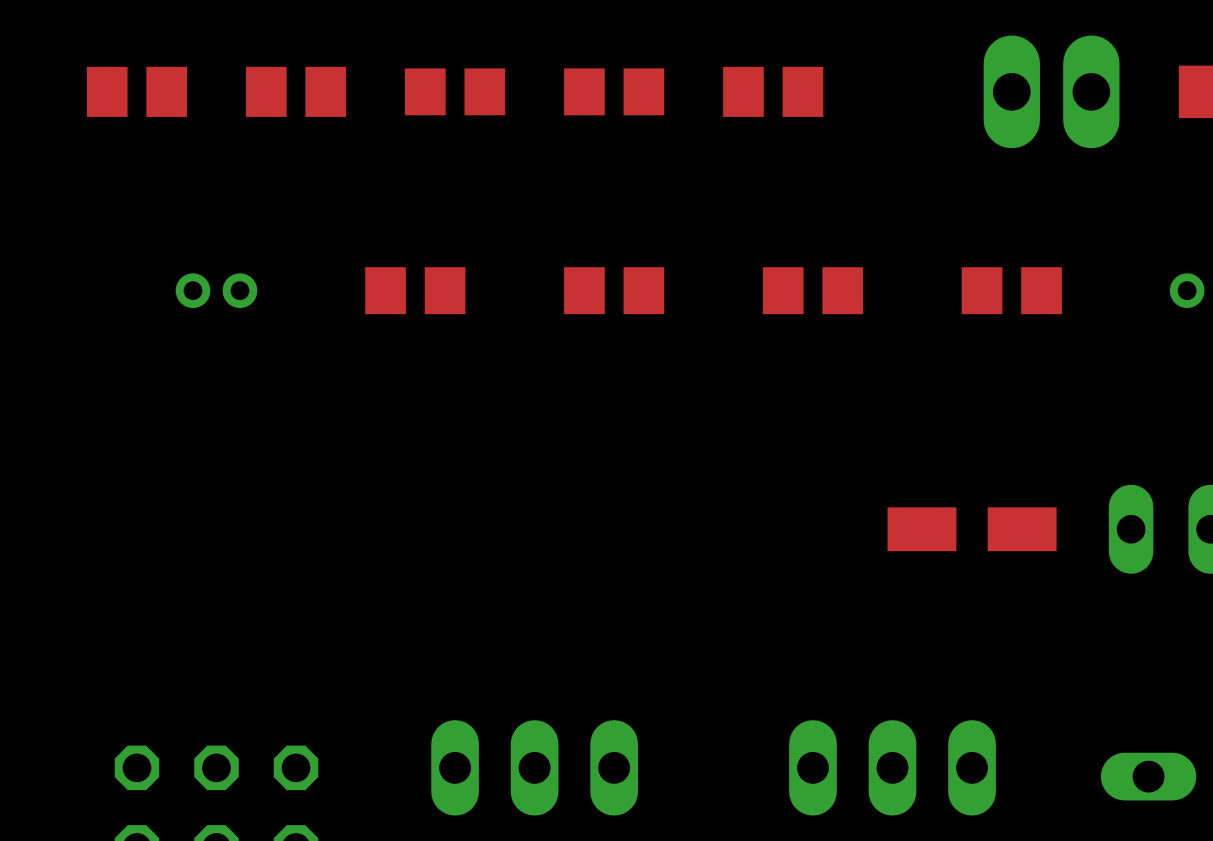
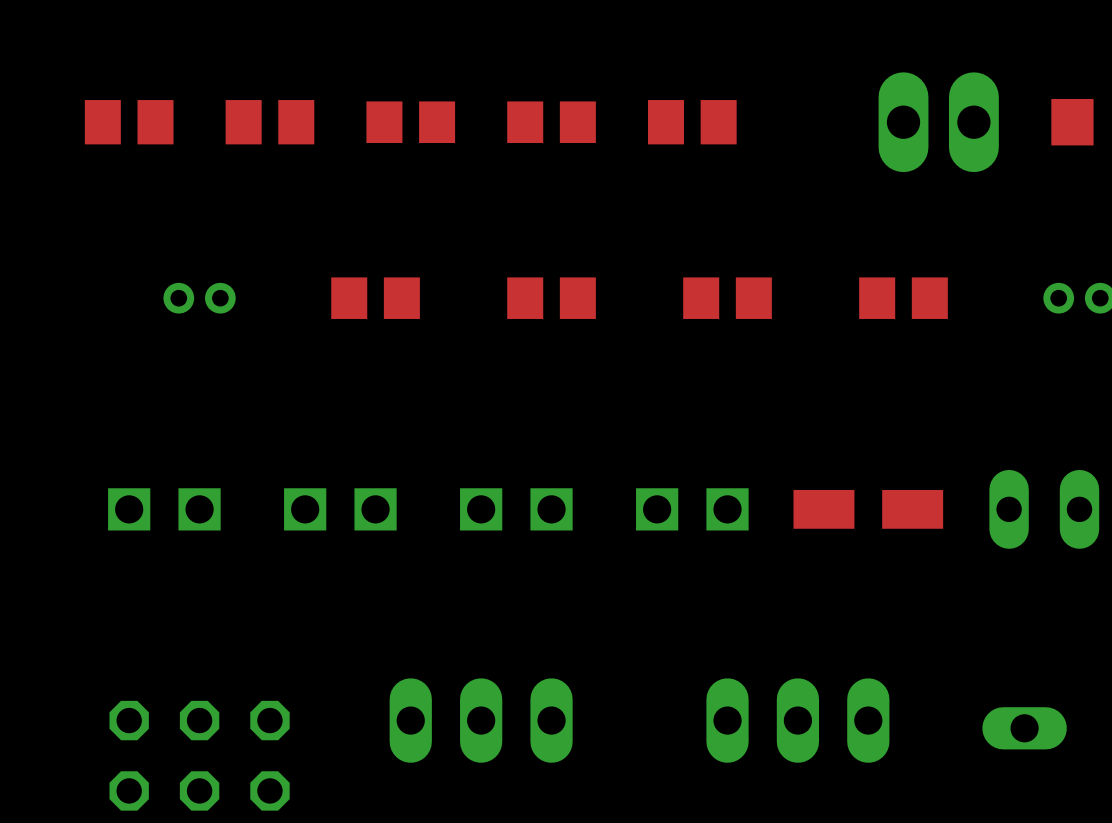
part: none -> (164, 509)
part: none -> (340, 509)
part: none -> (516, 509)
part: none -> (692, 509)

